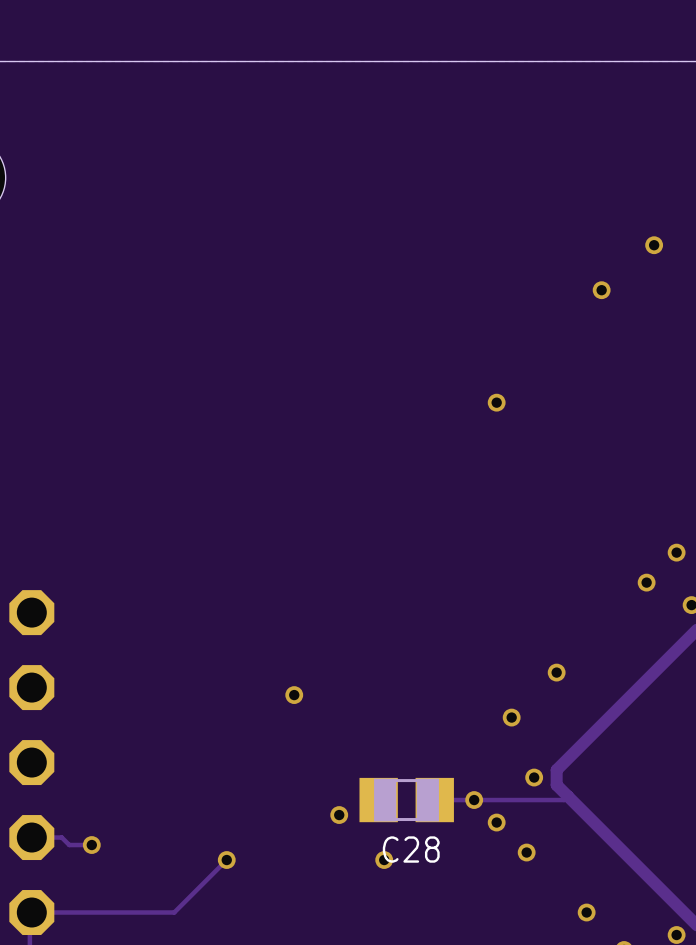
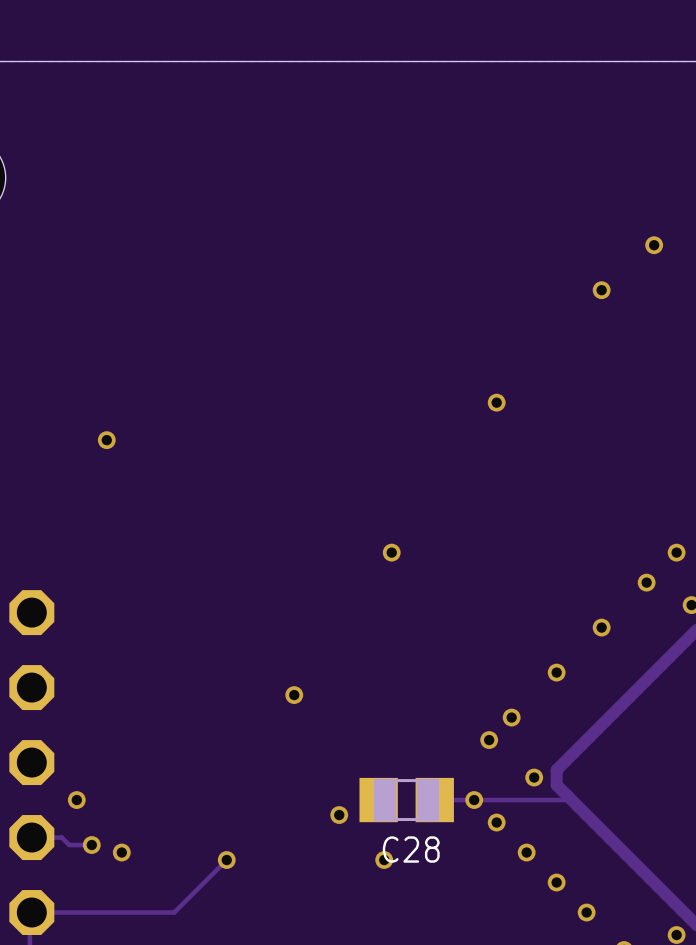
via: none -> (106, 440)
via: none -> (391, 552)
via: none -> (601, 627)
via: none -> (489, 740)
via: none -> (76, 800)
via: none -> (121, 852)
via: none -> (556, 882)

